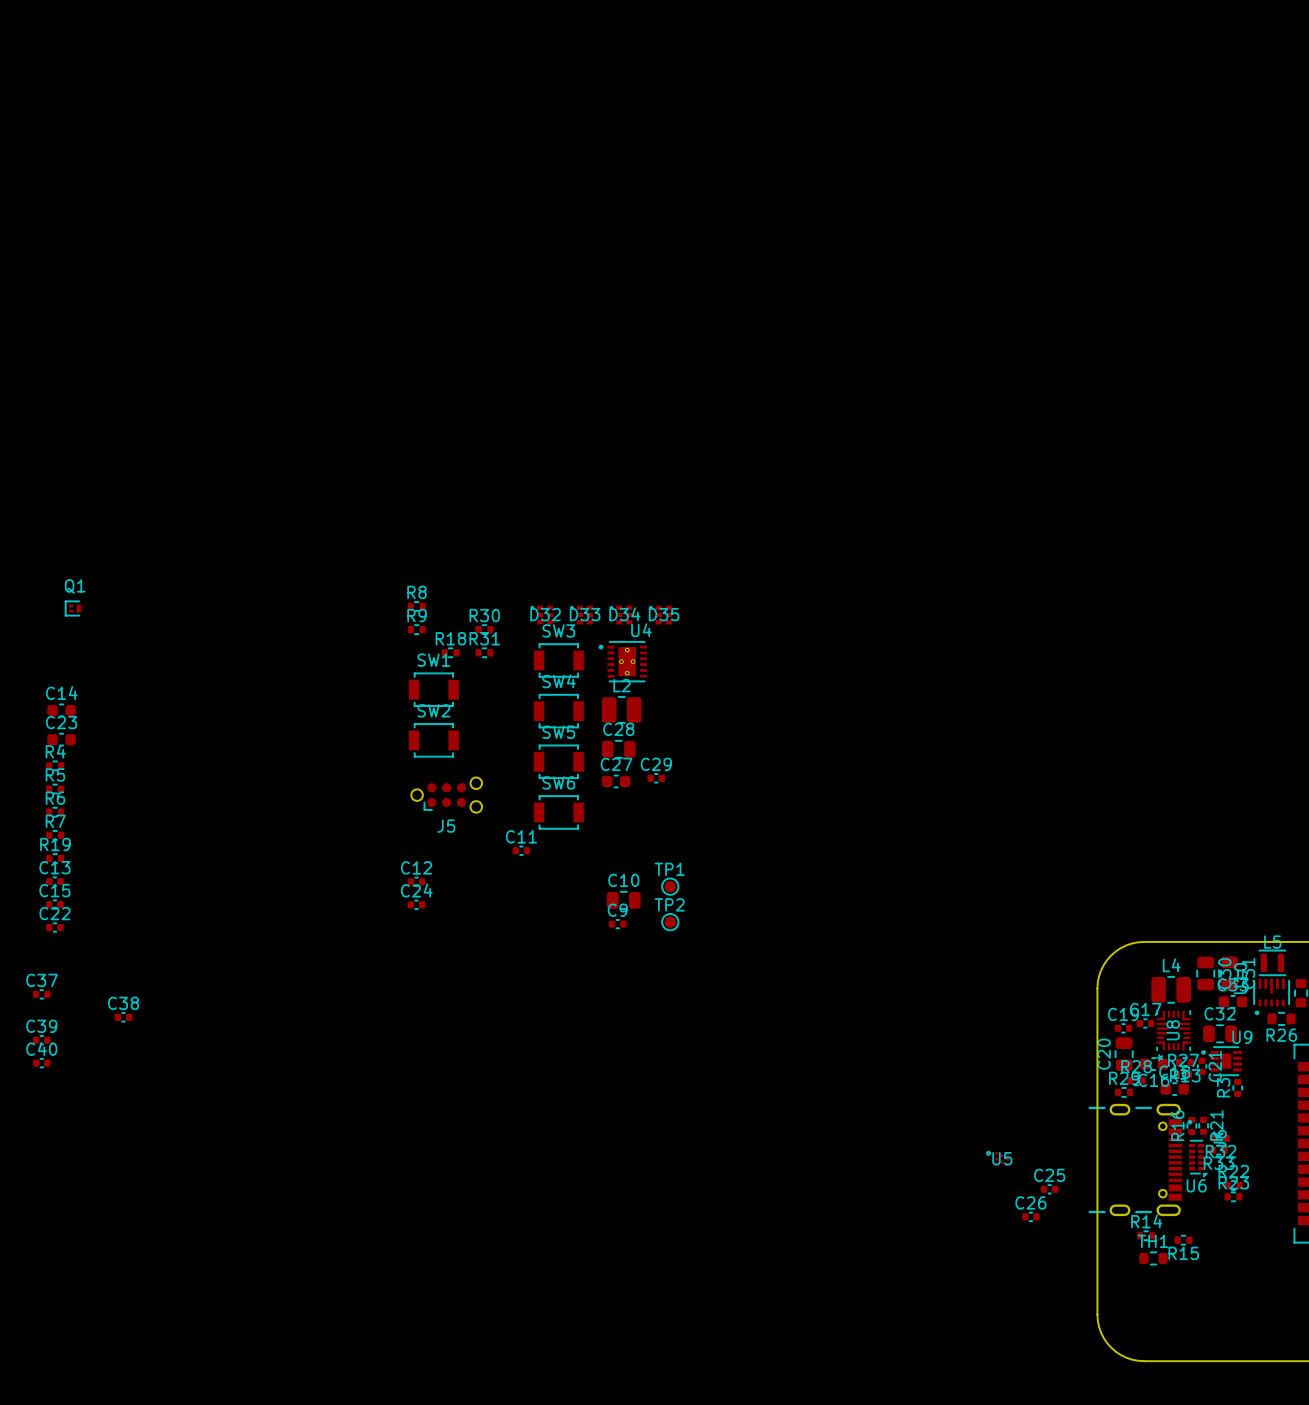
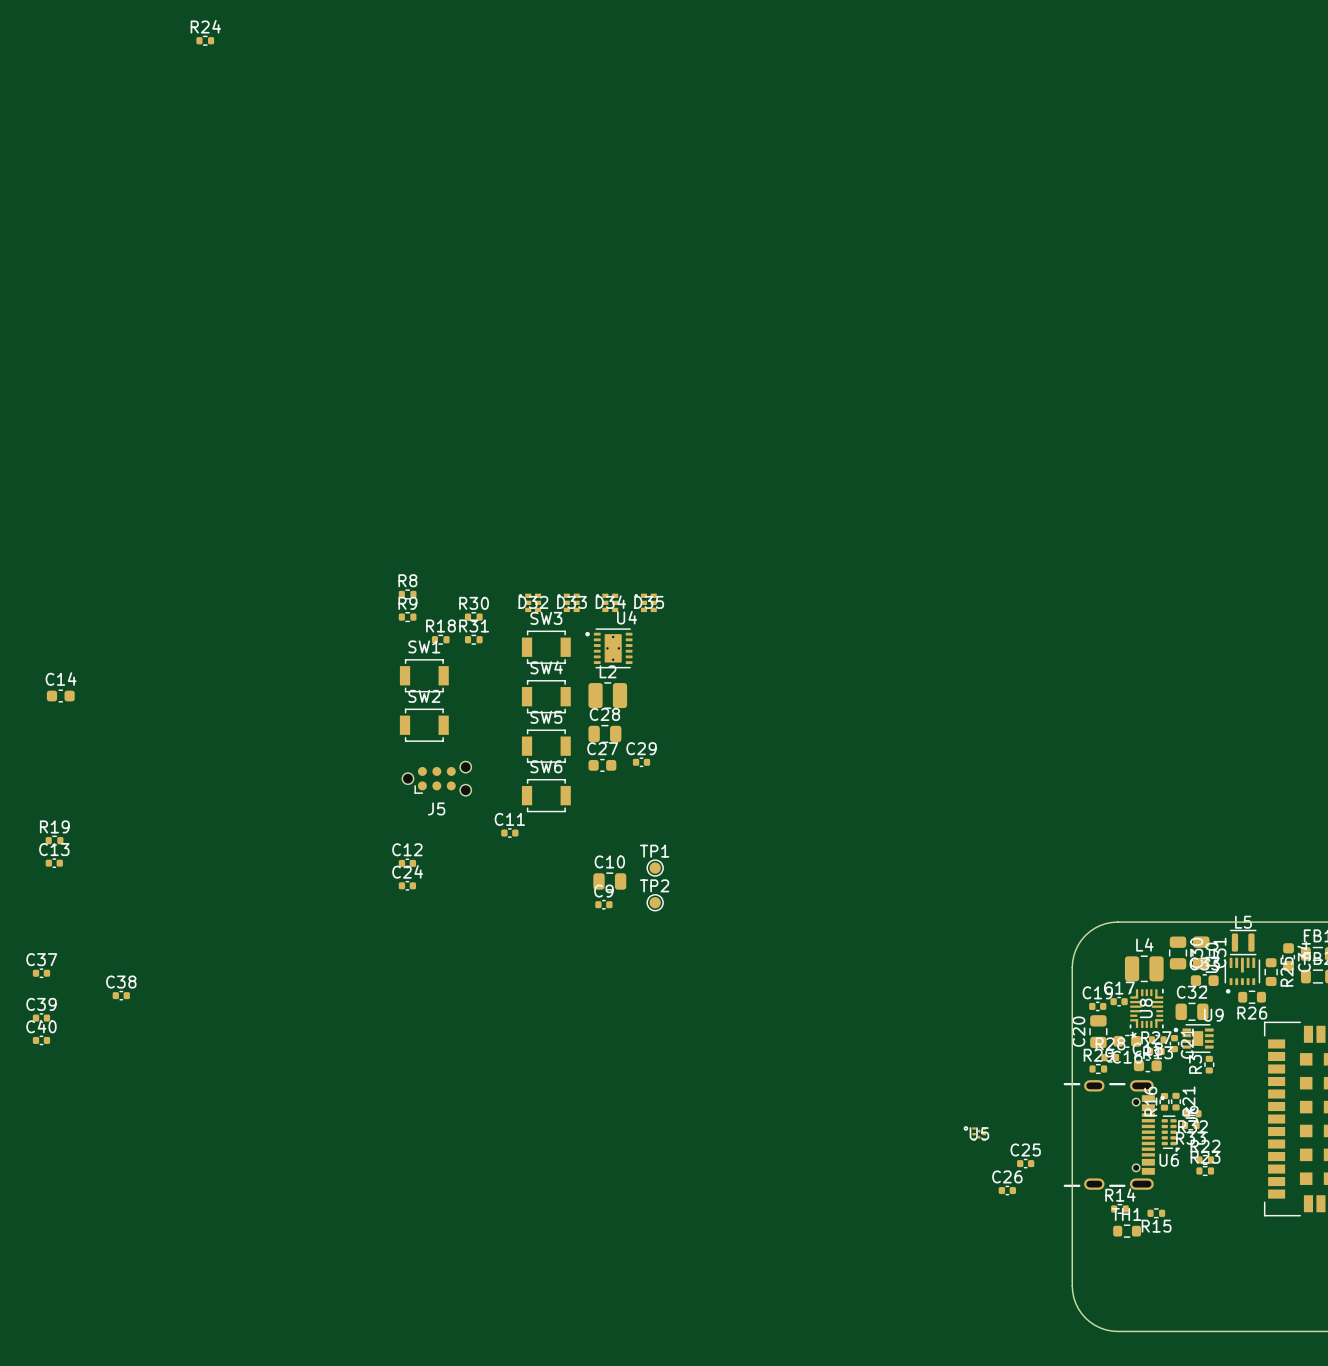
R24: none -> (205, 40)
Q1: (73, 608) -> none
C23: (61, 739) -> none
R4: (55, 765) -> none
R5: (55, 789) -> none
R6: (55, 812) -> none
R7: (55, 835) -> none
C15: (54, 904) -> none
C22: (54, 927) -> none

